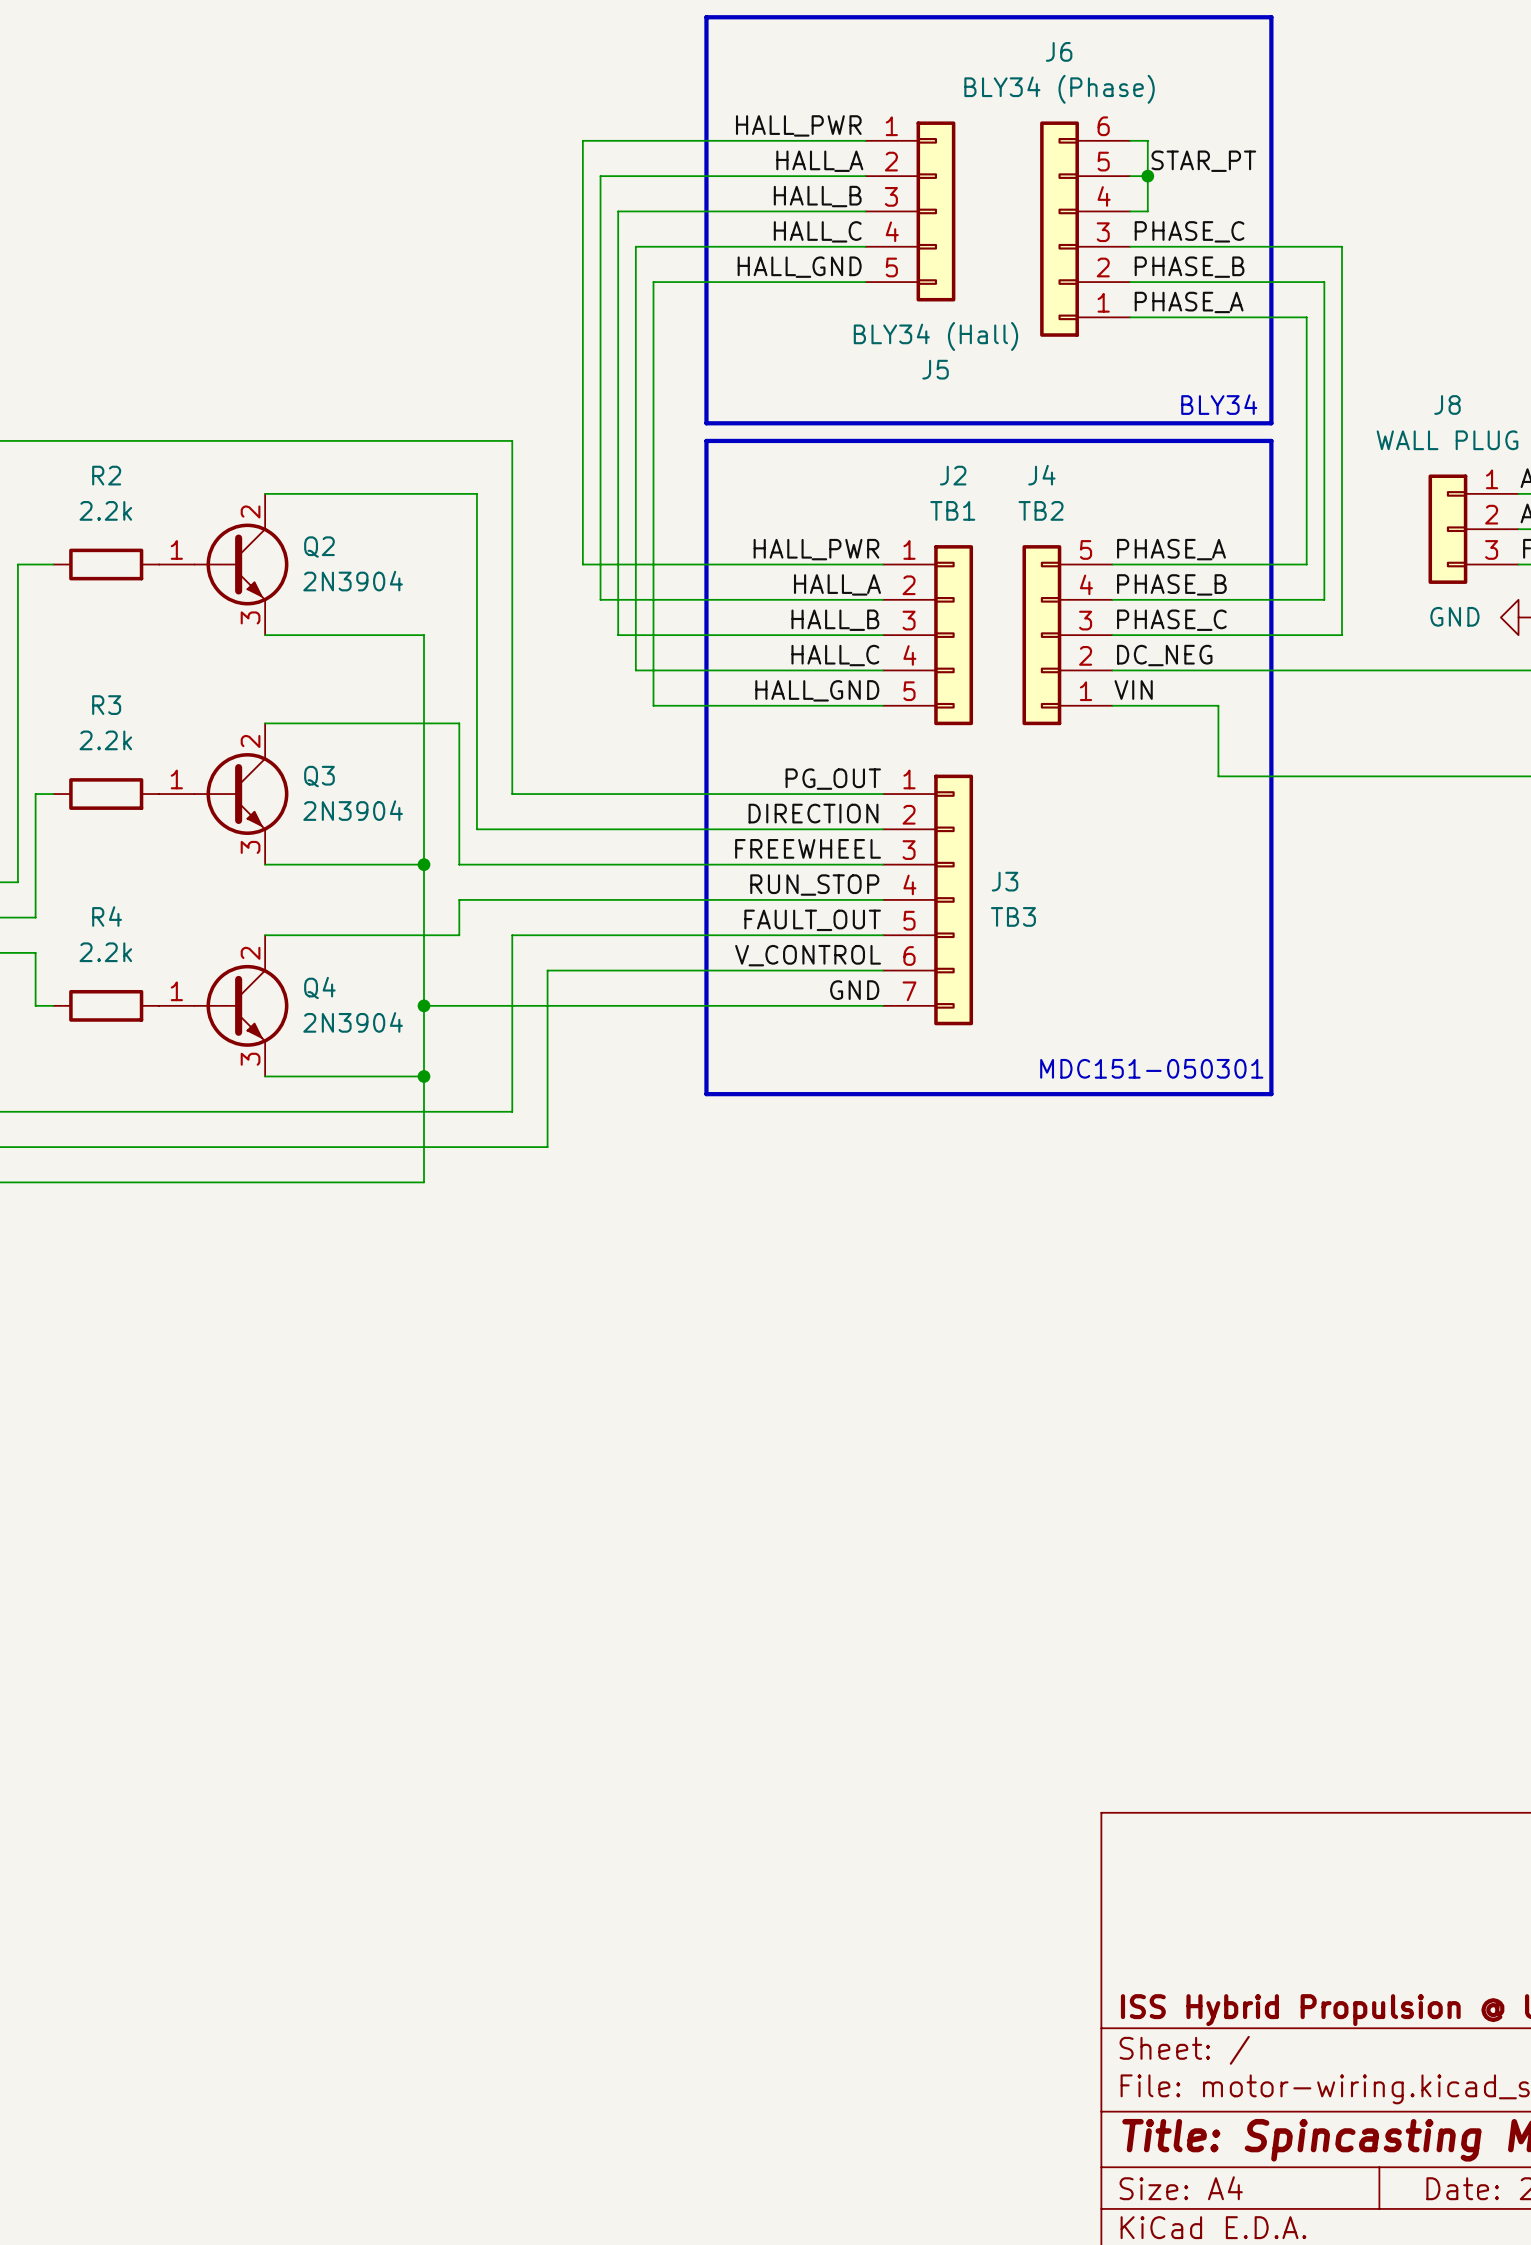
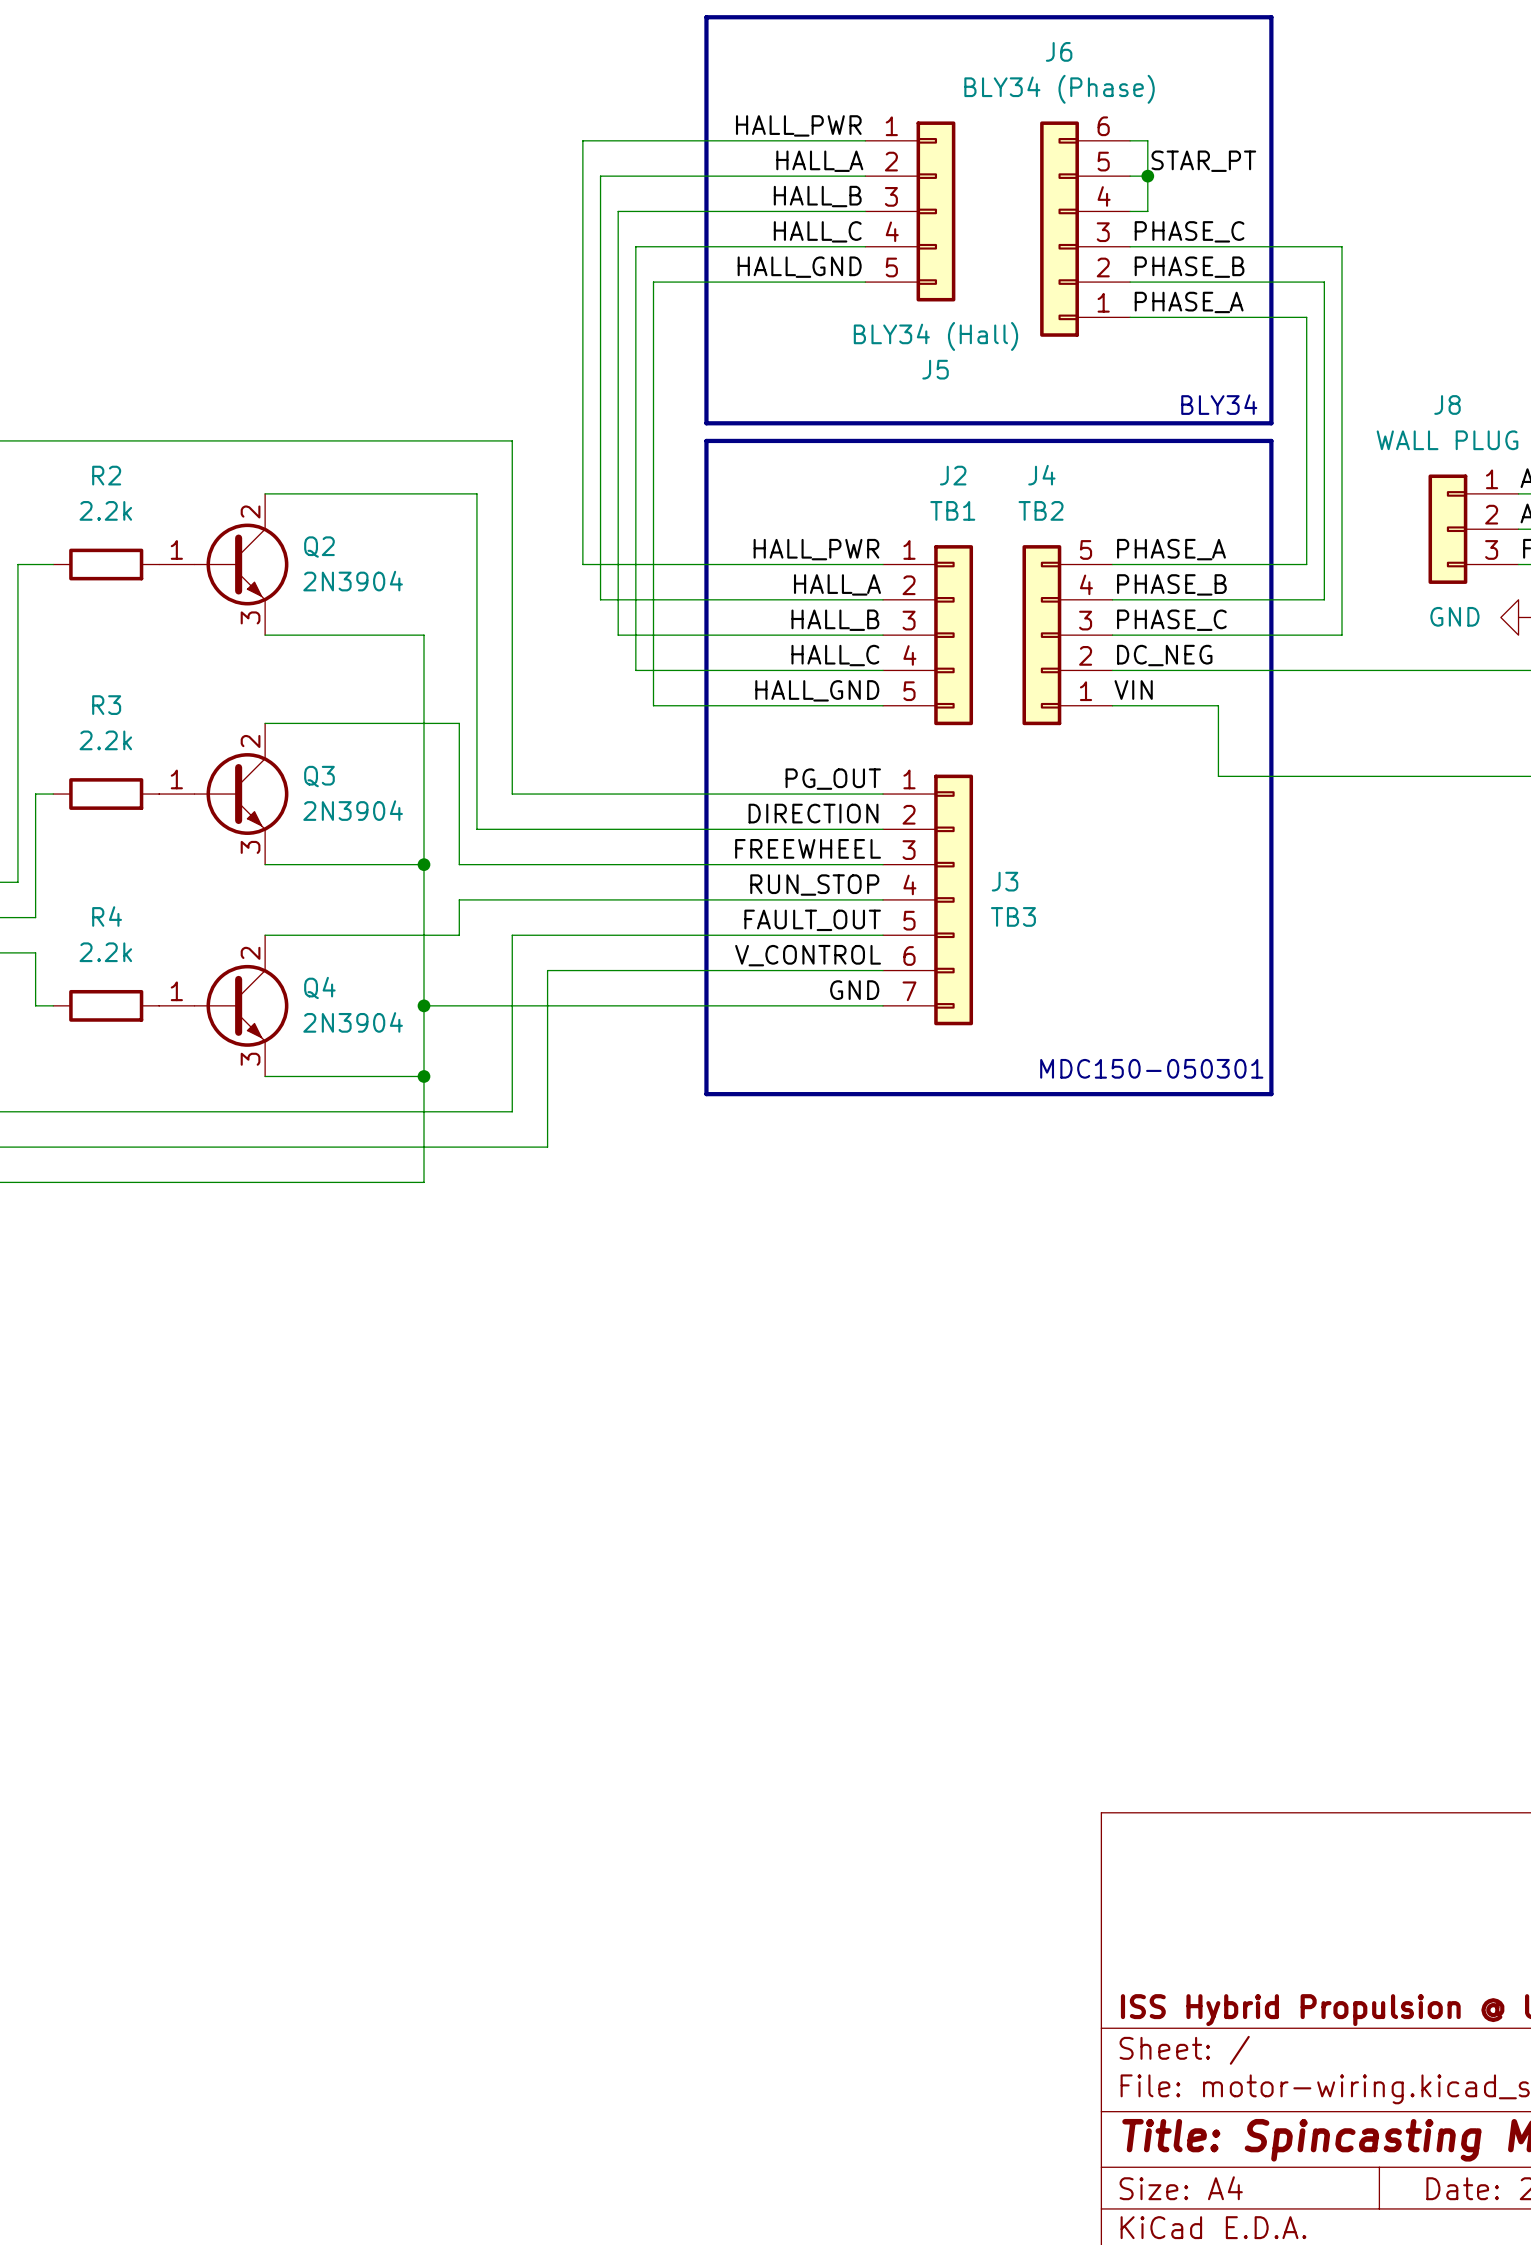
text: MDC151-050301 (1151, 1068) -> MDC150-050301 (1151, 1068)

